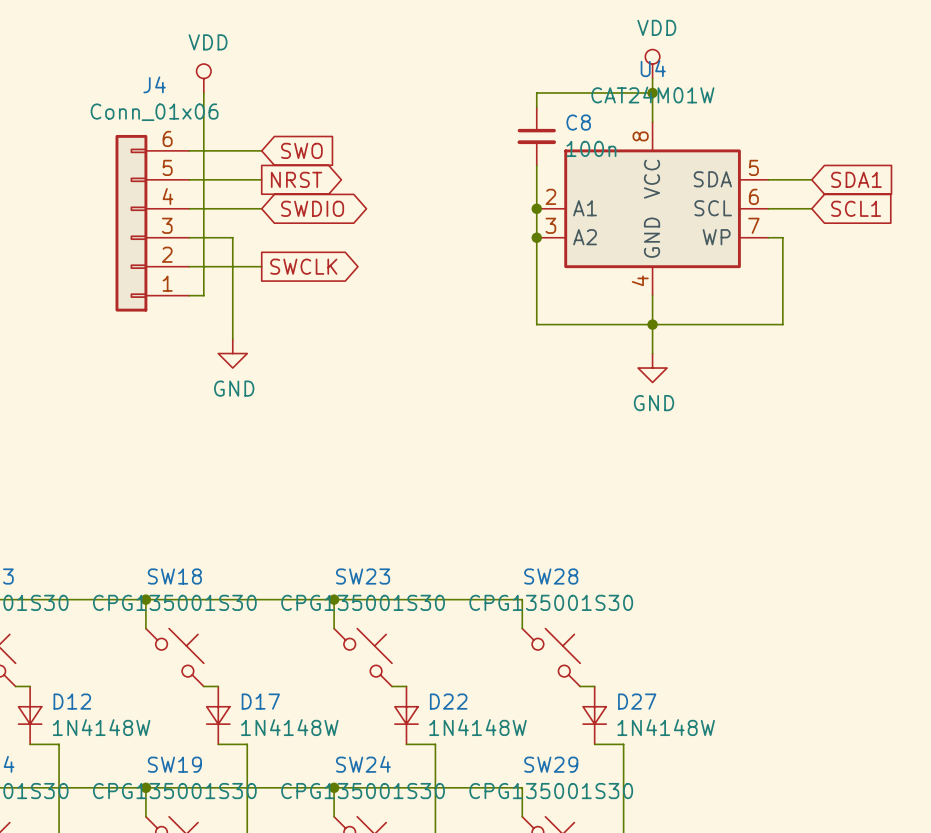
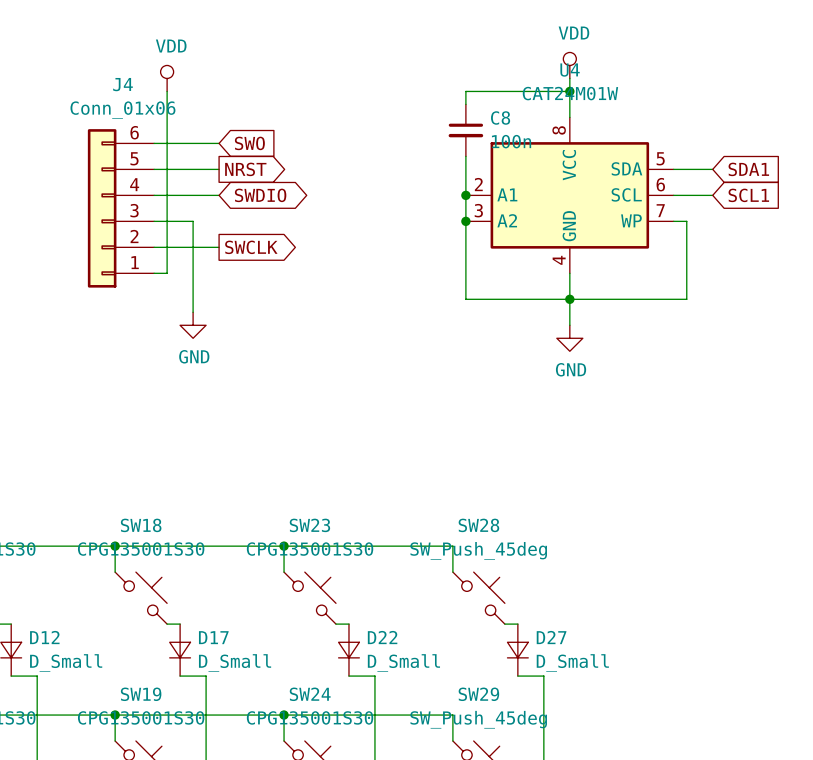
SW28 value: CPG135001S30 (551, 602) -> SW_Push_45deg (478, 550)
D12 value: 1N4148W (101, 727) -> D_Small (66, 663)
D17 value: 1N4148W (289, 727) -> D_Small (235, 663)
D22 value: 1N4148W (477, 727) -> D_Small (403, 663)
D27 value: 1N4148W (666, 727) -> D_Small (572, 663)
SW29 value: CPG135001S30 (551, 791) -> SW_Push_45deg (478, 719)

